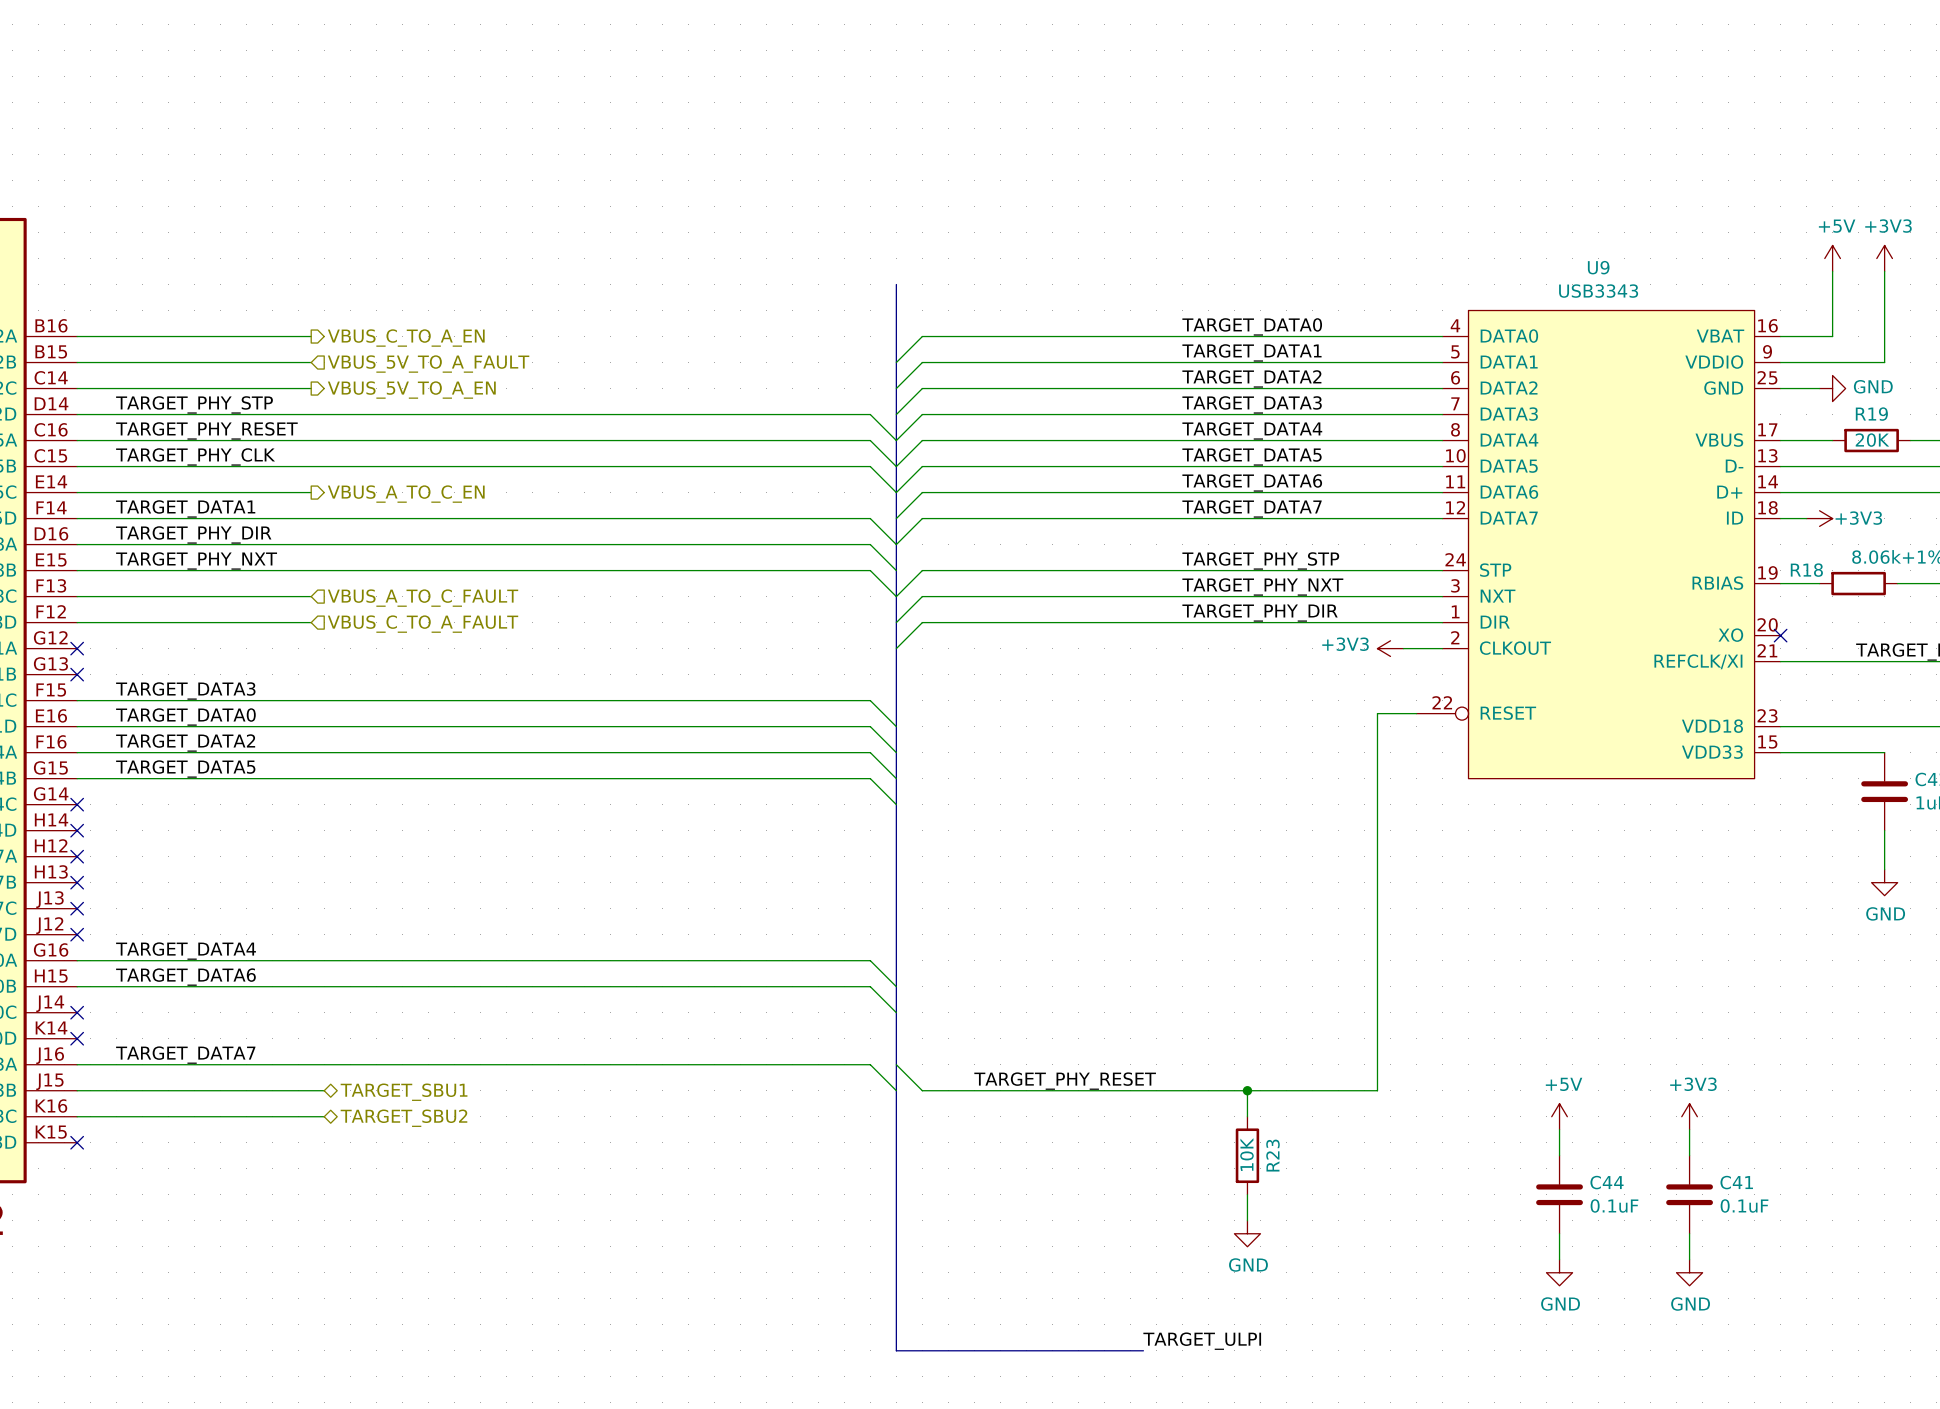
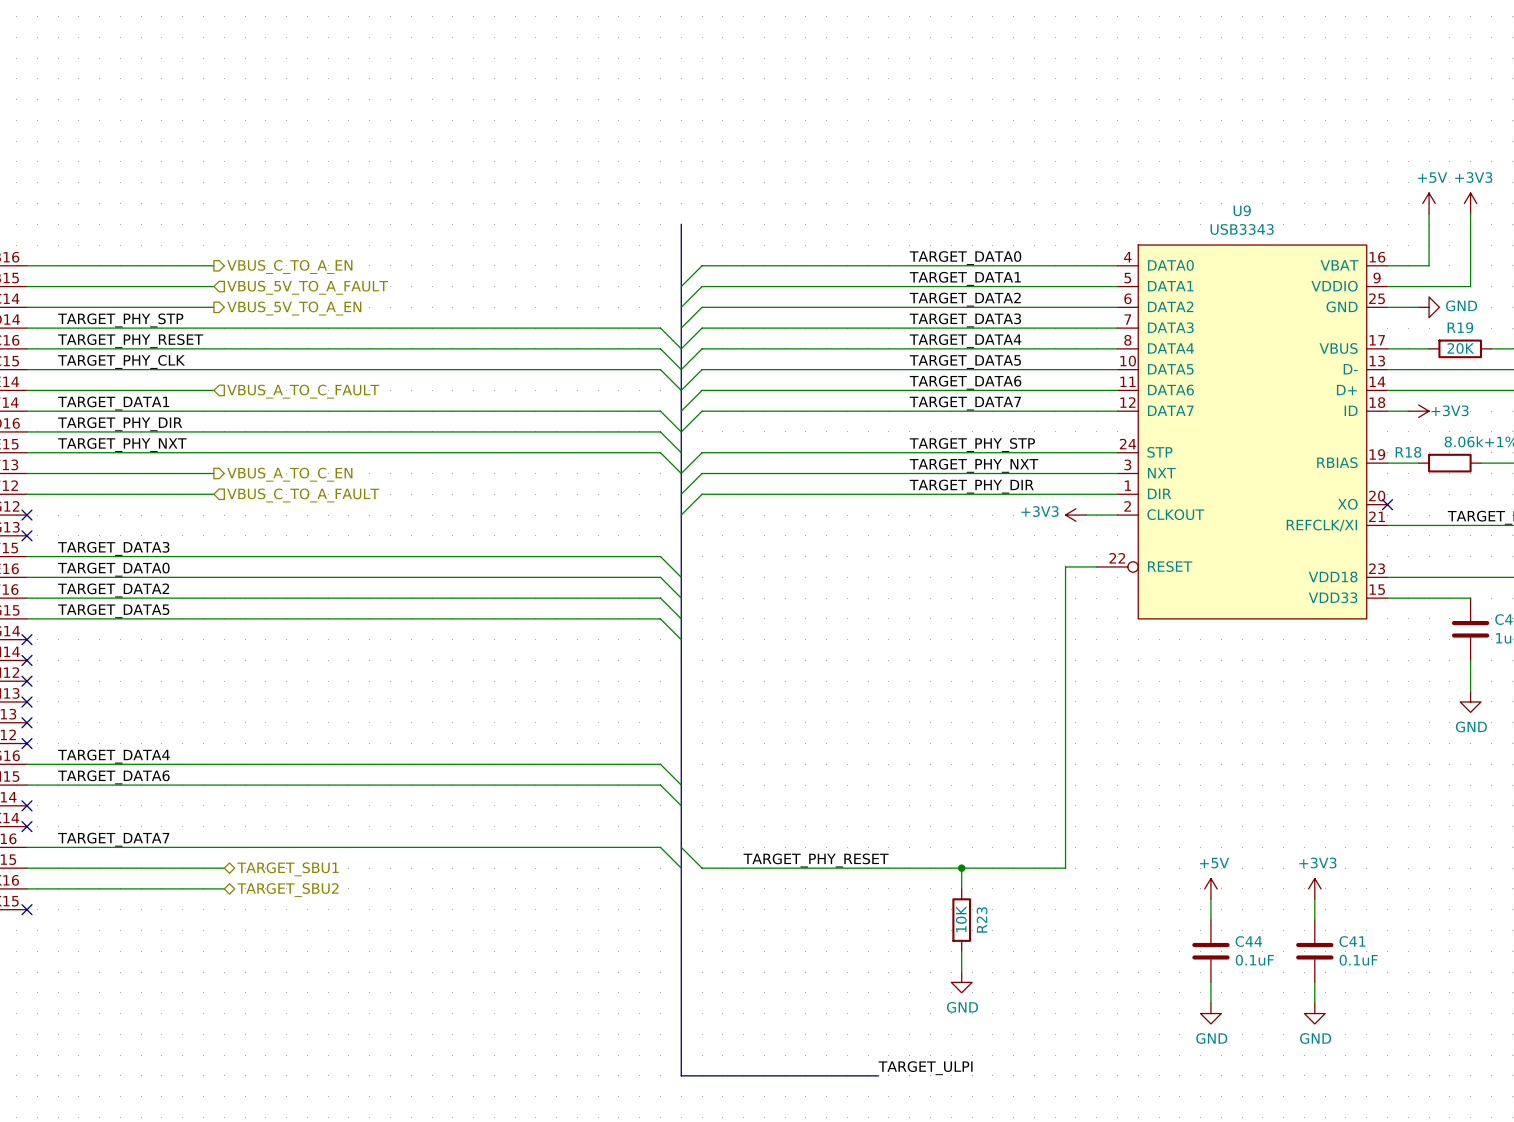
hierarchical label shape: output (406, 494) -> input (303, 391)
hierarchical label: VBUS_A_TO_C_EN (406, 494) -> VBUS_A_TO_C_FAULT (303, 391)
hierarchical label shape: input (423, 598) -> output (289, 474)
hierarchical label: VBUS_A_TO_C_FAULT (423, 598) -> VBUS_A_TO_C_EN (289, 474)

